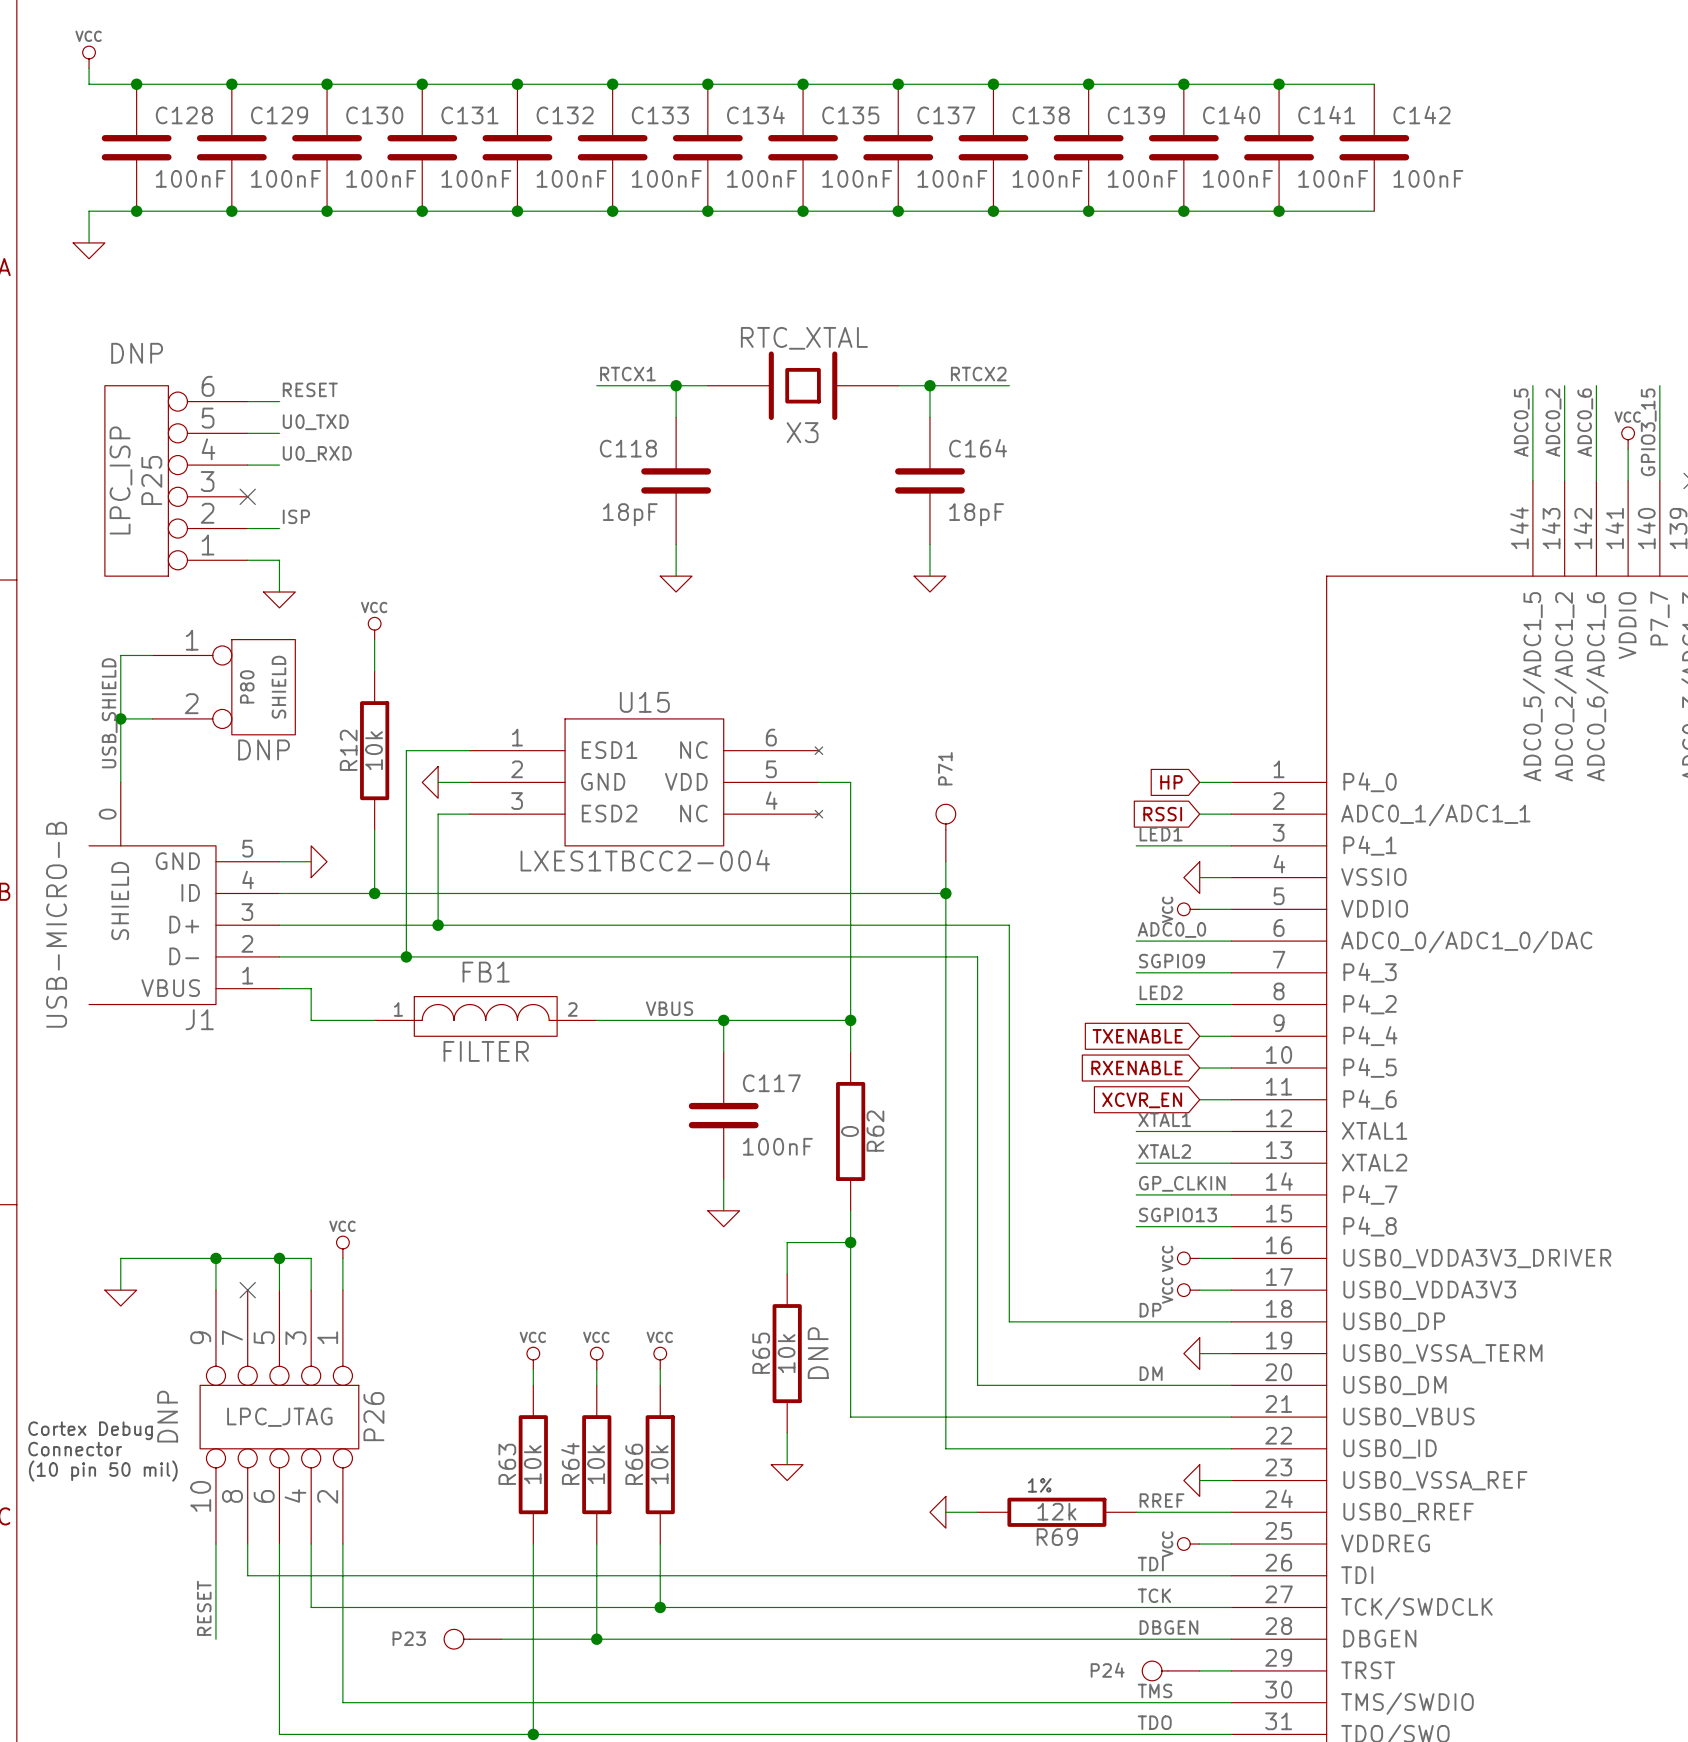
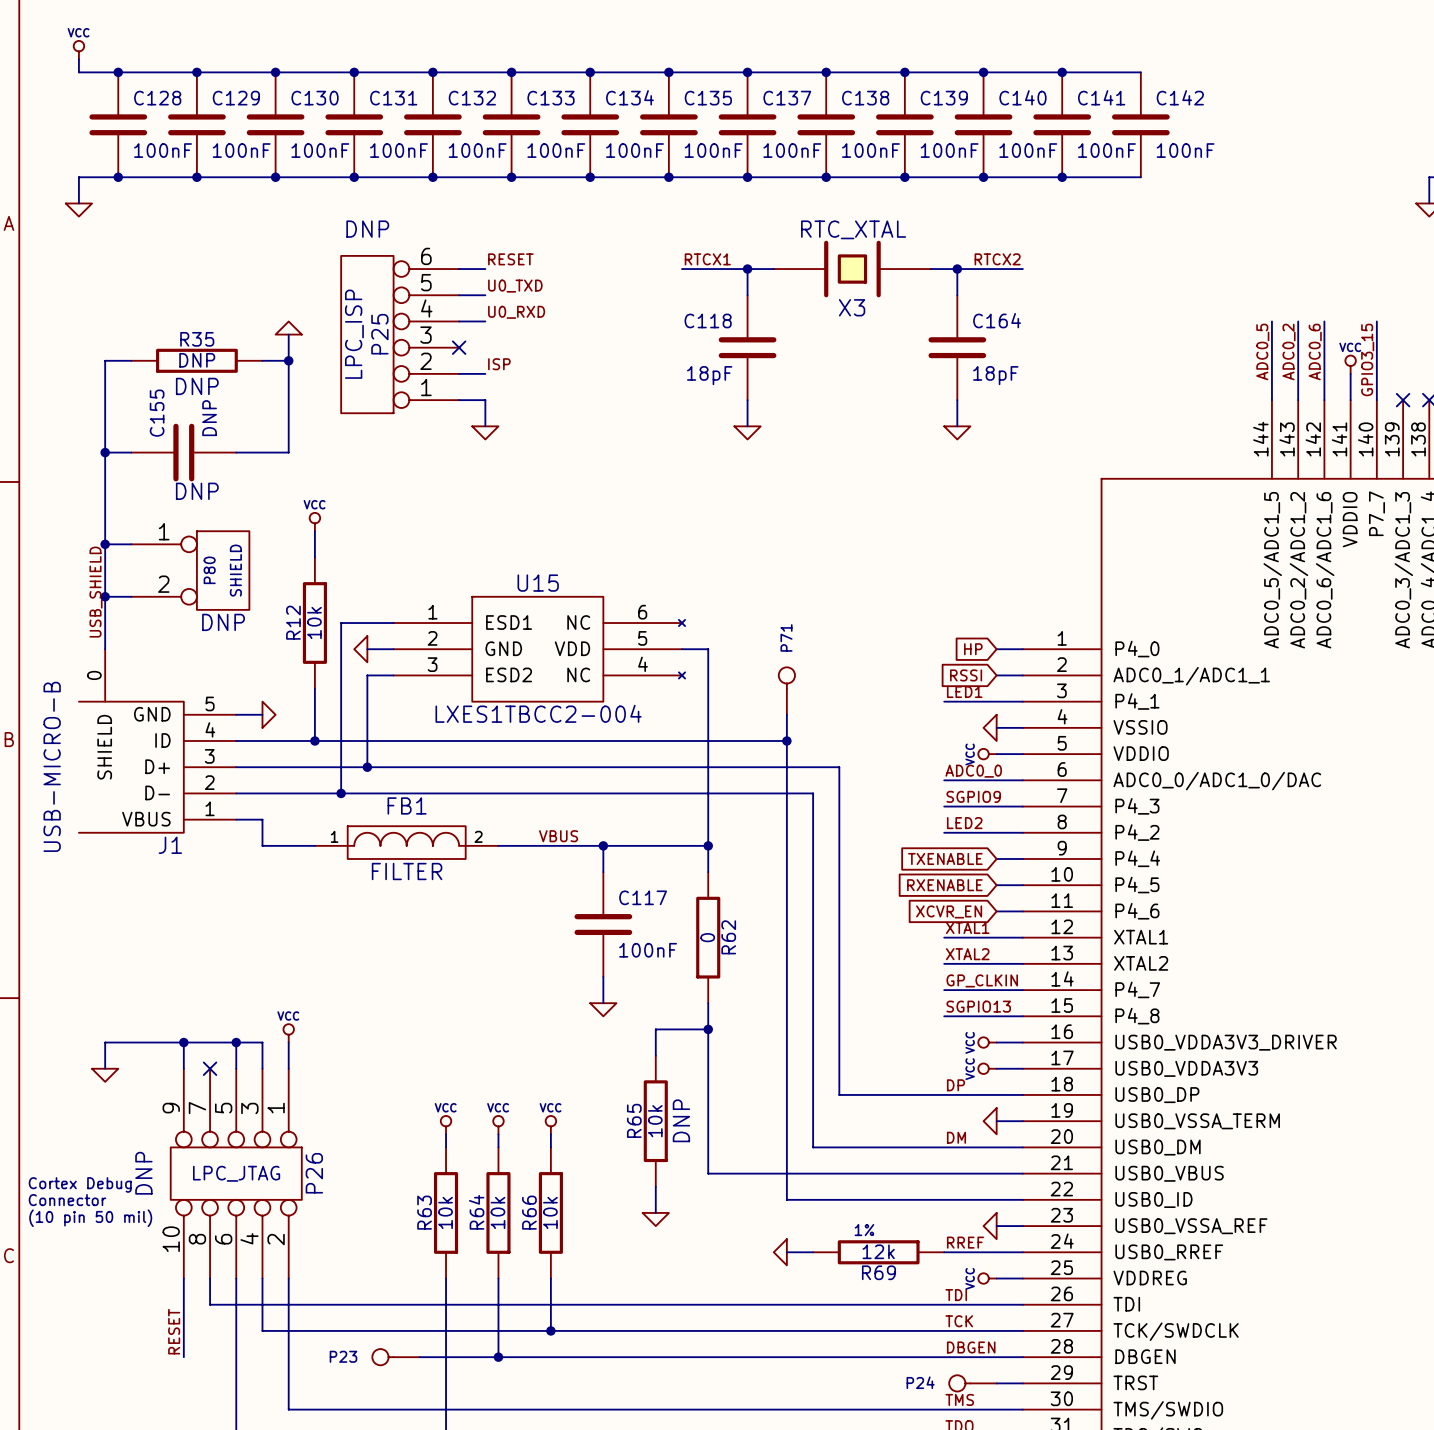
junction: none -> (957, 269)
label position: RTCX1 (627, 374) -> RTCX1 (707, 259)
label position: RTCX2 (978, 374) -> RTCX2 (997, 259)
wire: (596, 385) (707, 385) -> (682, 269) (773, 269)
wire: (676, 385) (676, 417) -> (747, 269) (747, 295)
junction: (676, 385) -> none
X3 position: (803, 385) -> (852, 269)
wire: (898, 385) (1009, 385) -> (931, 269) (1022, 269)
wire: (929, 385) (929, 417) -> (957, 269) (957, 295)
junction position: (929, 385) -> (747, 269)
label position: RESET (310, 389) -> RESET (510, 259)
power symbol: none -> (288, 328)
wire: (247, 401) (279, 401) -> (459, 269) (485, 269)
wire: none -> (288, 334) (288, 452) (236, 452)
no-connect mark: none -> (459, 347)
label position: U0_TXD (315, 422) -> U0_TXD (515, 286)
wire: none -> (131, 360) (105, 360) (105, 544)
R35: none -> DNP (196, 360)
wire: (247, 433) (279, 433) -> (459, 295) (485, 295)
wire: none -> (262, 360) (288, 360)
junction: none -> (288, 360)
label position: U0_RXD (317, 453) -> U0_RXD (516, 312)
wire: (247, 465) (279, 465) -> (459, 321) (485, 321)
P25 position: (176, 480) -> (400, 334)
C118 position: (676, 480) -> (747, 347)
C164 position: (929, 480) -> (957, 347)
no-connect mark: (247, 496) -> none
label position: ISP (296, 516) -> ISP (499, 364)
power symbol: none -> (957, 432)
wire: (247, 528) (279, 528) -> (459, 373) (485, 373)
wire: none -> (105, 452) (131, 452)
junction: none -> (105, 452)
C155: none -> DNP (183, 452)
wire: (676, 544) (676, 576) -> (747, 400) (747, 426)
wire: (929, 544) (929, 576) -> (957, 400) (957, 426)
wire: (247, 560) (279, 560) (279, 592) -> (459, 400) (485, 400) (485, 426)
power symbol position: (676, 584) -> (485, 432)
power symbol position: (929, 584) -> (747, 432)
power symbol: (279, 599) -> none
junction: none -> (105, 544)

